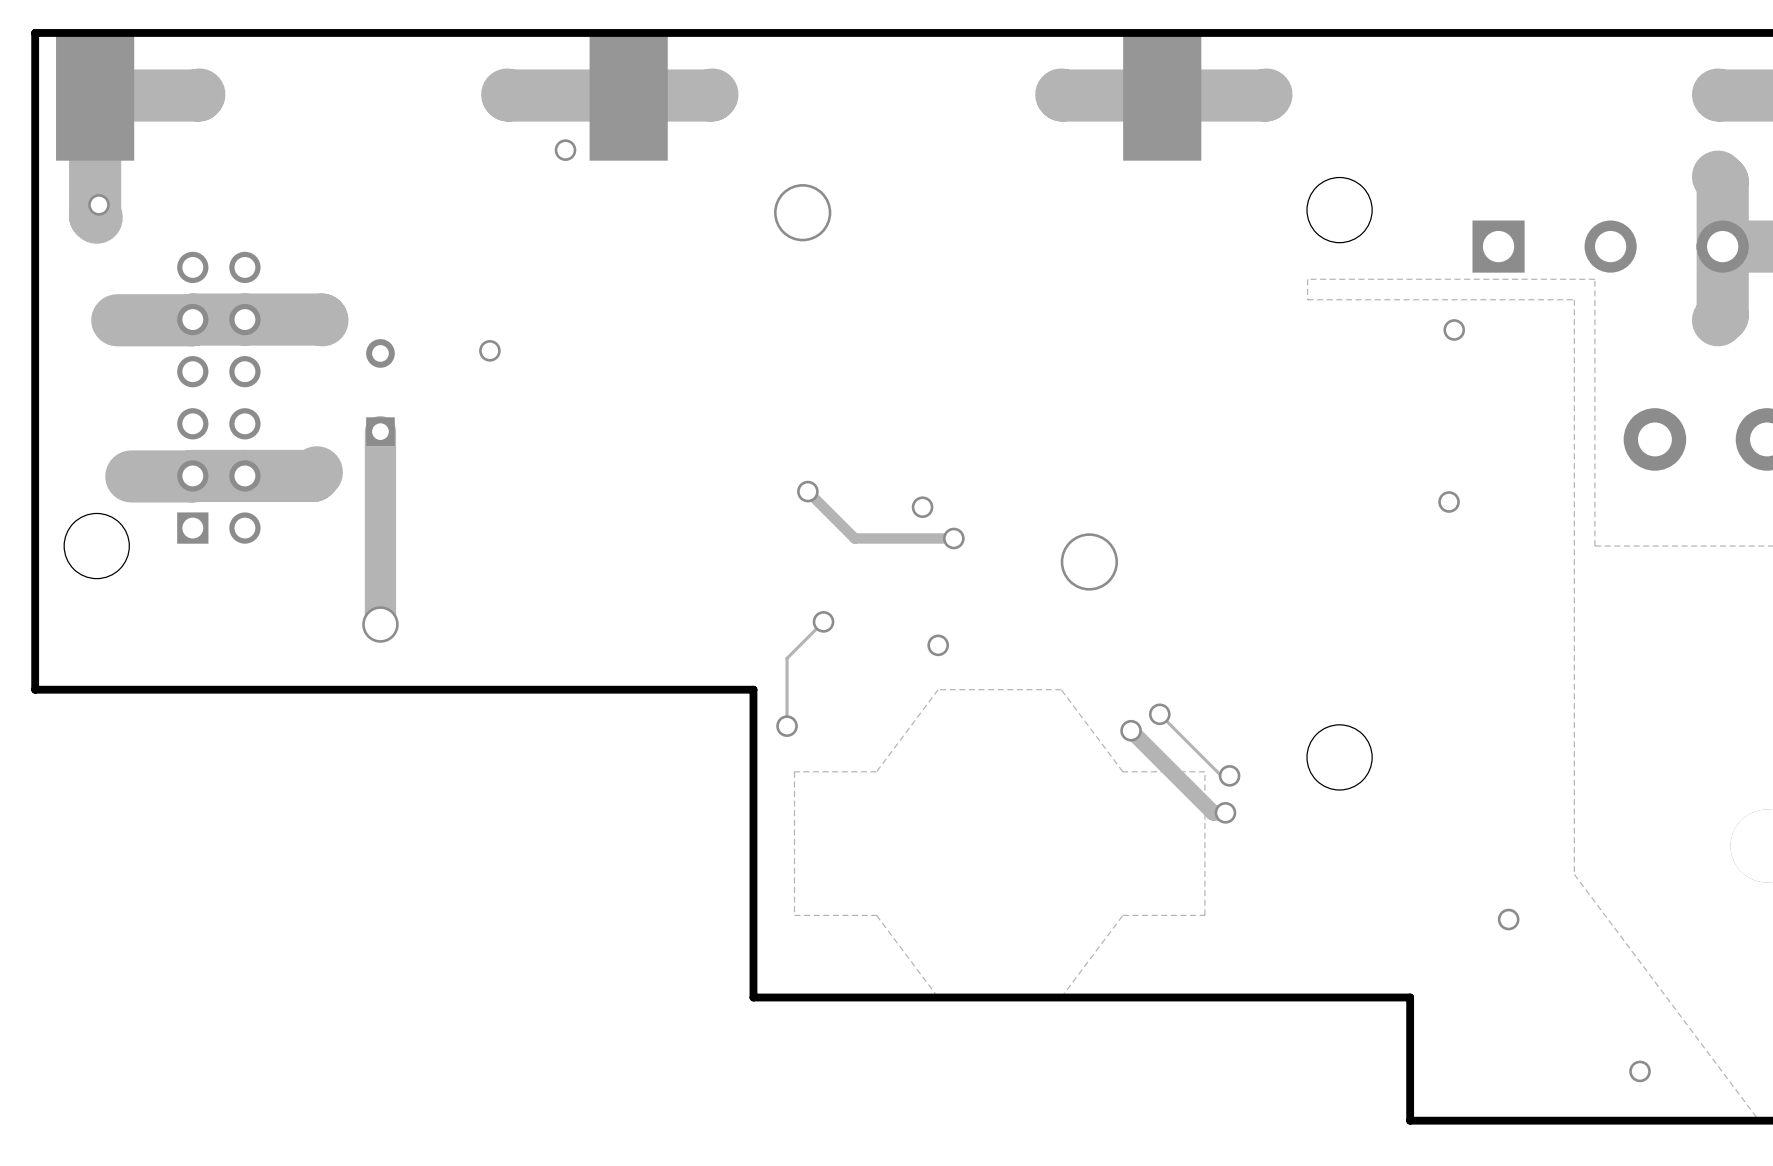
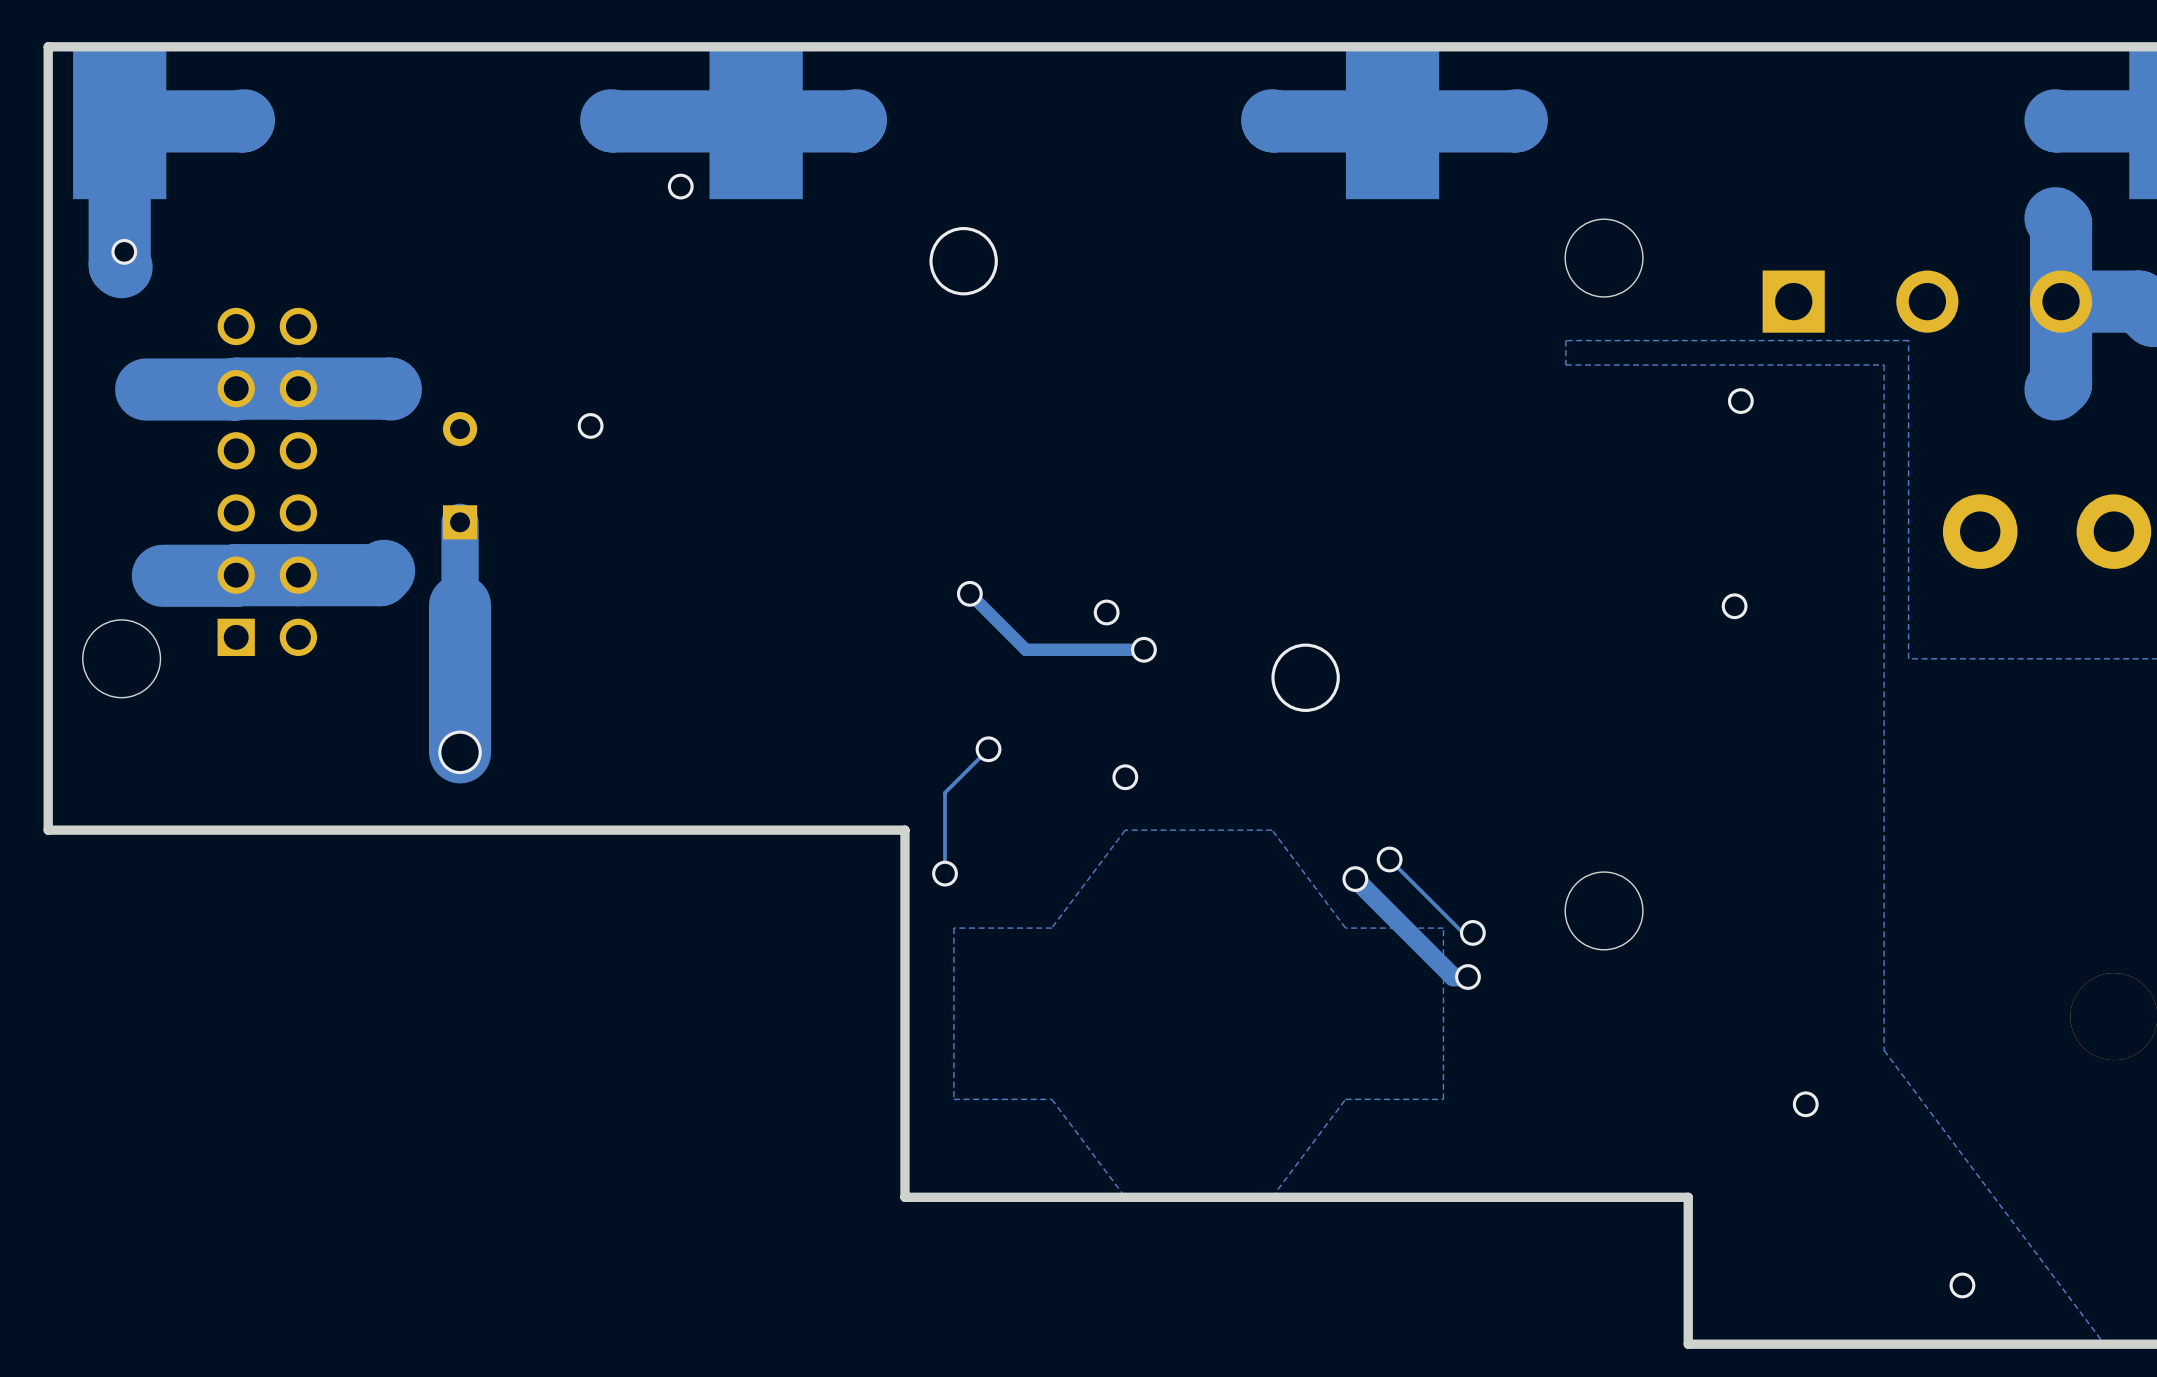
track width: thin (380, 501) (380, 624) -> thick (460, 605) (460, 752)

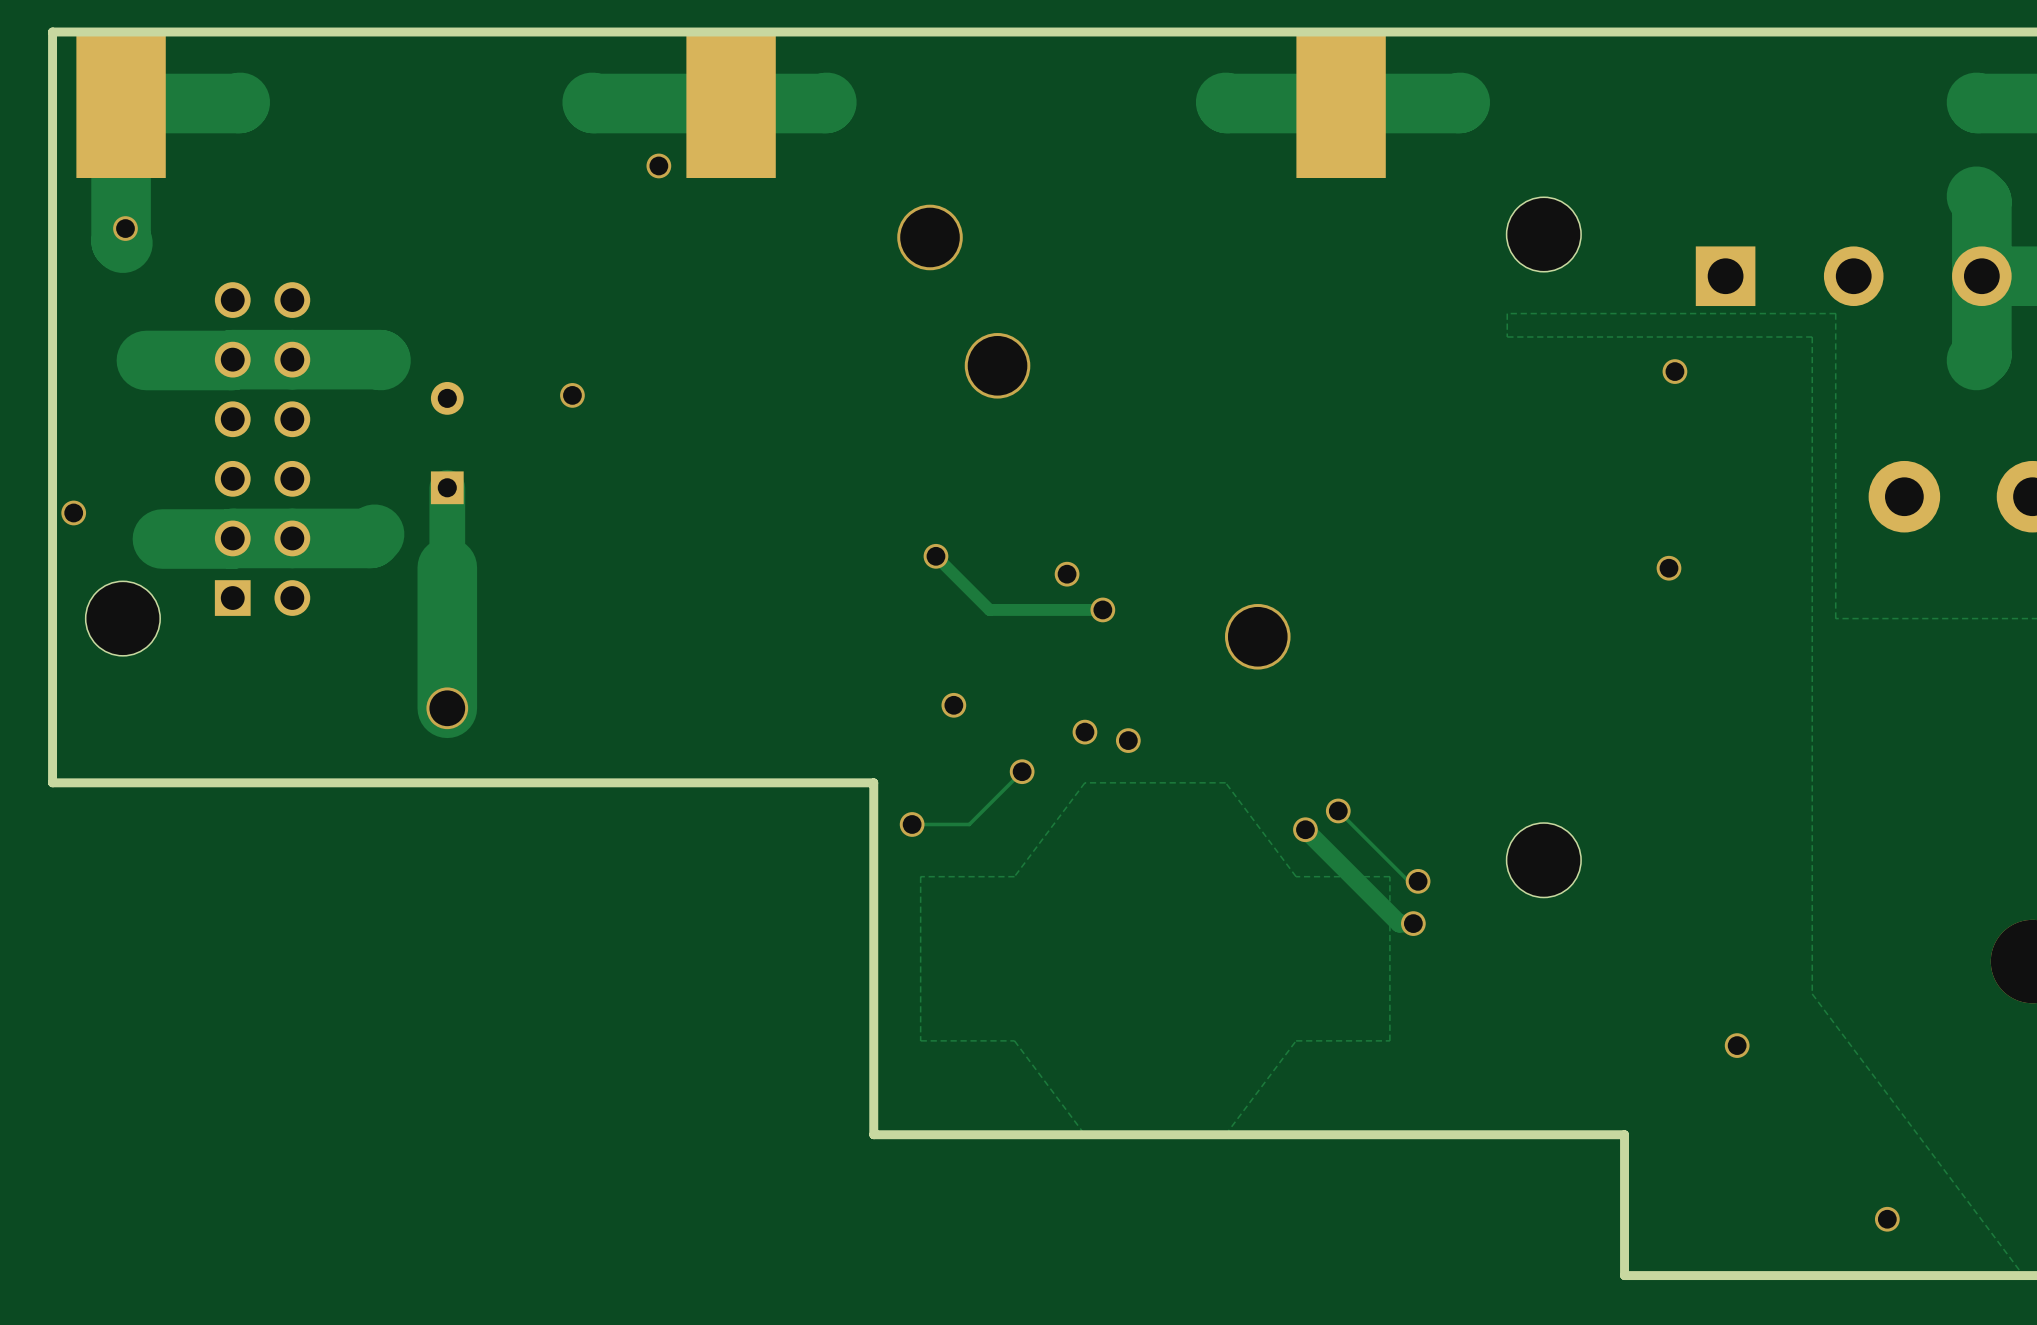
via: none -> (997, 365)
via: none -> (73, 512)
track: (988, 749) (945, 792) (945, 873) -> (1022, 771) (969, 824) (912, 824)
via: none -> (1128, 740)
via: none -> (1022, 771)

